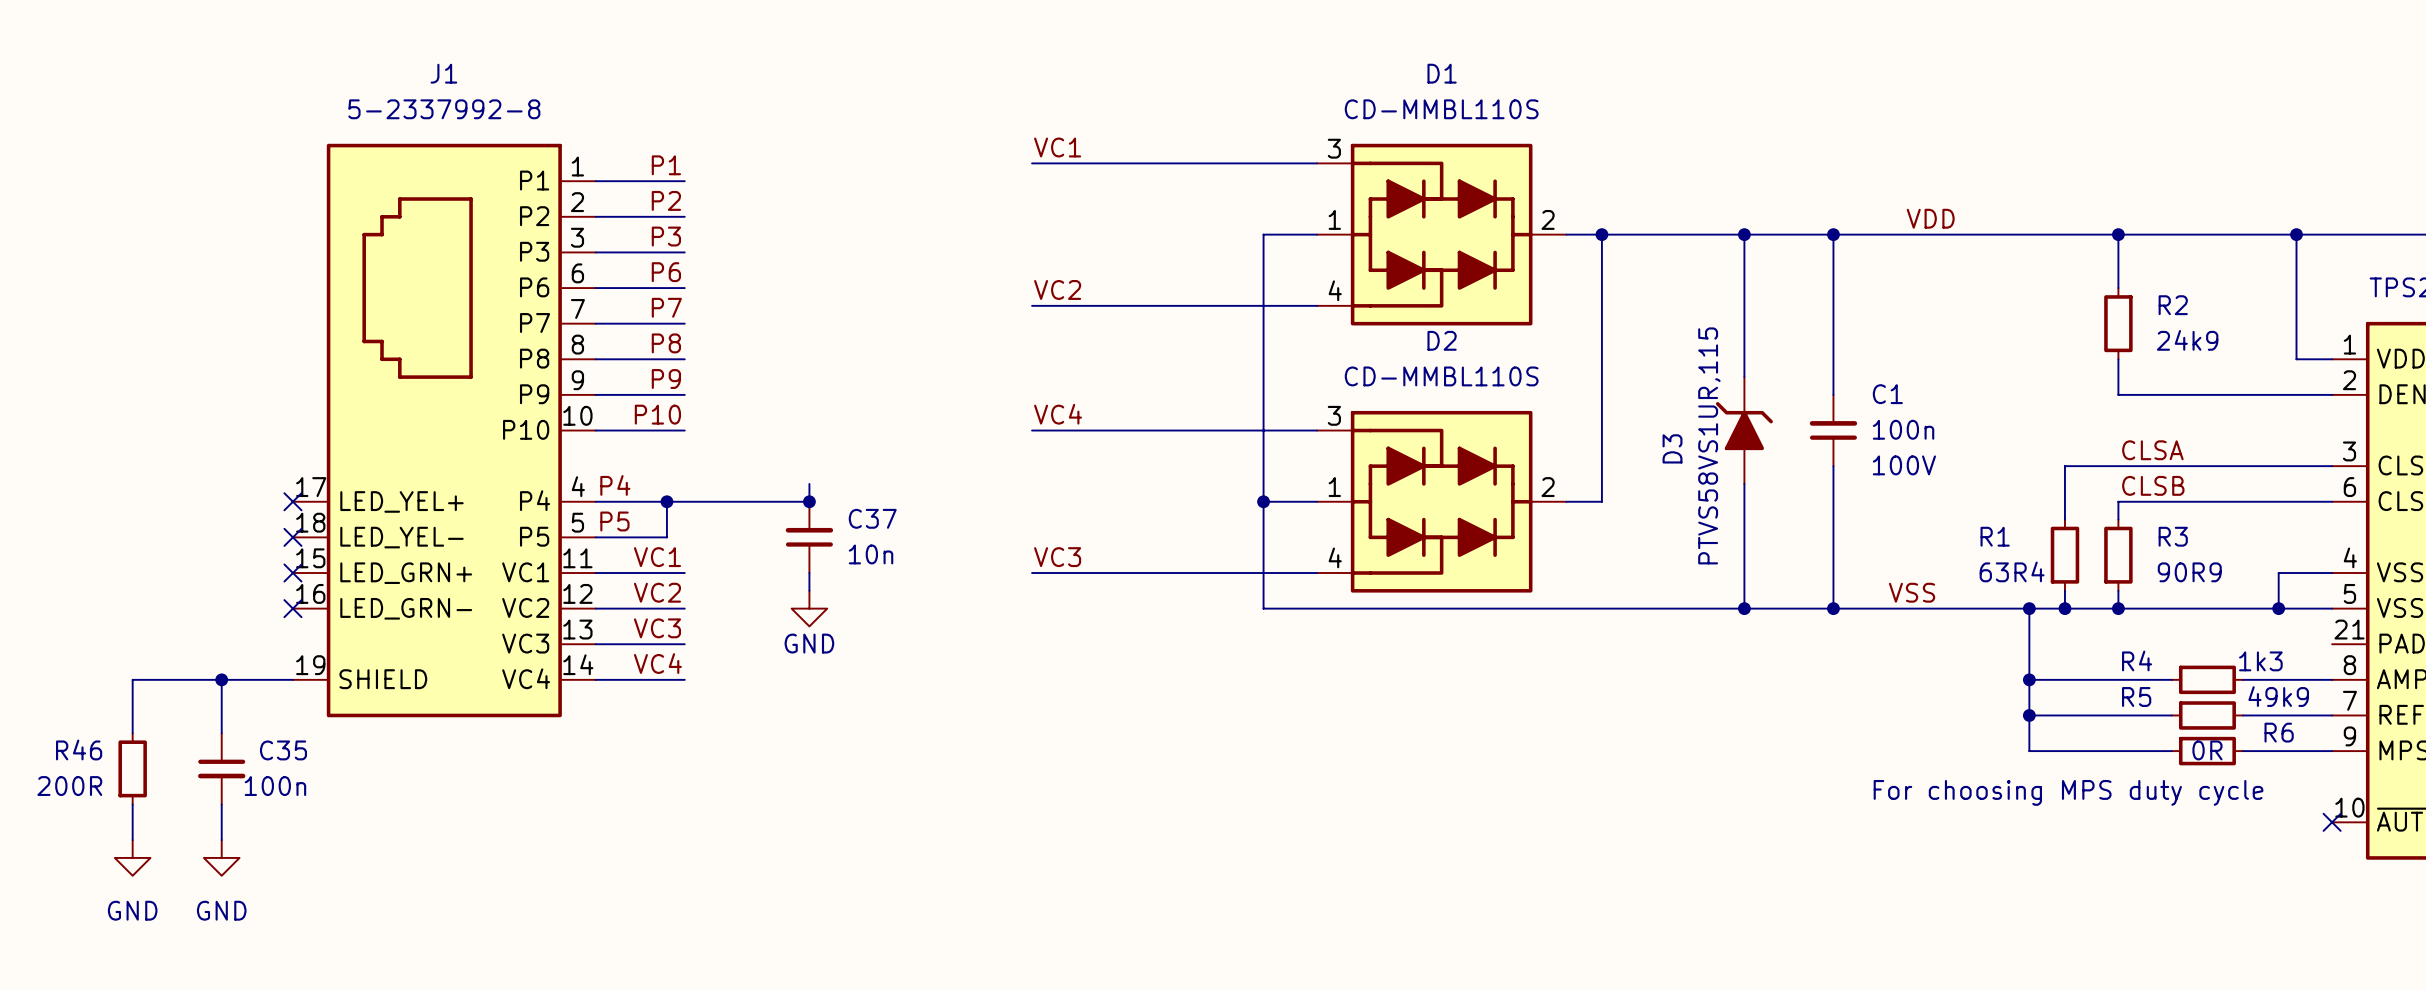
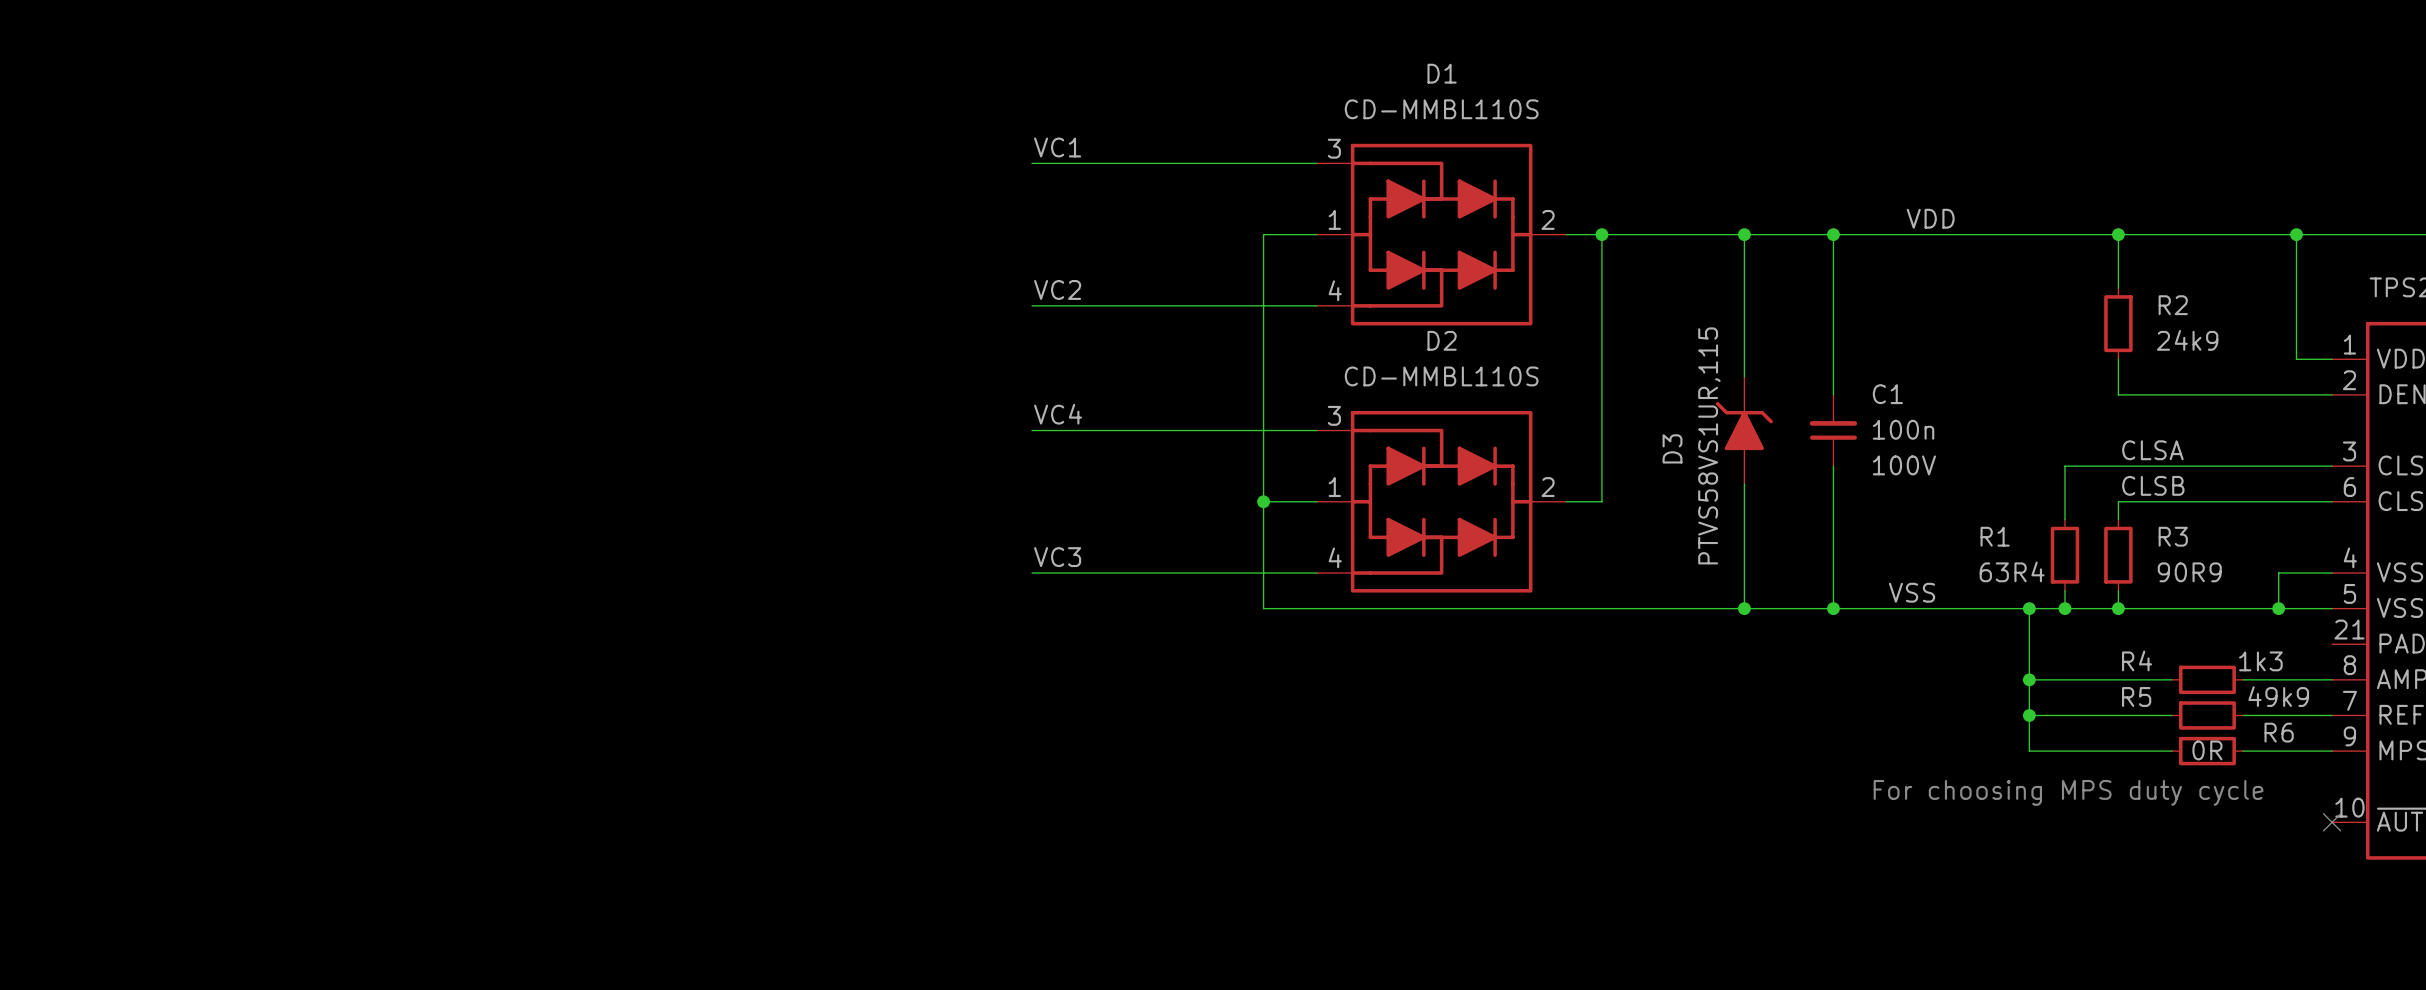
label: P1 (666, 165) -> none
wire: (595, 181) (684, 181) -> none
label: P2 (666, 200) -> none
wire: (595, 216) (684, 216) -> none
label: P3 (666, 236) -> none
wire: (595, 252) (684, 252) -> none
label: P6 (666, 272) -> none
wire: (595, 288) (684, 288) -> none
label: P7 (666, 307) -> none
wire: (595, 323) (684, 323) -> none
label: P8 (666, 343) -> none
wire: (595, 359) (684, 359) -> none
label: P9 (666, 379) -> none
wire: (595, 394) (684, 394) -> none
label: P10 (657, 414) -> none
J1: (444, 430) -> none
wire: (595, 430) (684, 430) -> none
wire: (809, 483) (809, 501) (595, 501) -> none
label: P4 (615, 485) -> none
no-connect mark: (292, 501) -> none
wire: (666, 501) (666, 537) (595, 537) -> none
junction: (666, 501) -> none
junction: (809, 501) -> none
label: P5 (614, 521) -> none
no-connect mark: (292, 537) -> none
C37: (809, 537) -> none
label: VC1 (657, 557) -> none
no-connect mark: (292, 573) -> none
wire: (595, 573) (684, 573) -> none
wire: (809, 573) (809, 590) -> none
label: VC2 (657, 592) -> none
no-connect mark: (292, 608) -> none
wire: (595, 608) (684, 608) -> none
power symbol: GND (809, 608) -> none
label: VC3 (657, 628) -> none
wire: (595, 644) (684, 644) -> none
label: VC4 (657, 663) -> none
wire: (221, 679) (221, 733) -> none
junction: (221, 679) -> none
wire: (292, 679) (132, 679) (132, 733) -> none
wire: (595, 679) (684, 679) -> none
R46: (132, 768) -> none
C35: (221, 768) -> none
wire: (132, 804) (132, 840) -> none
wire: (221, 804) (221, 840) -> none
power symbol: GND (132, 857) -> none
power symbol: GND (221, 857) -> none

